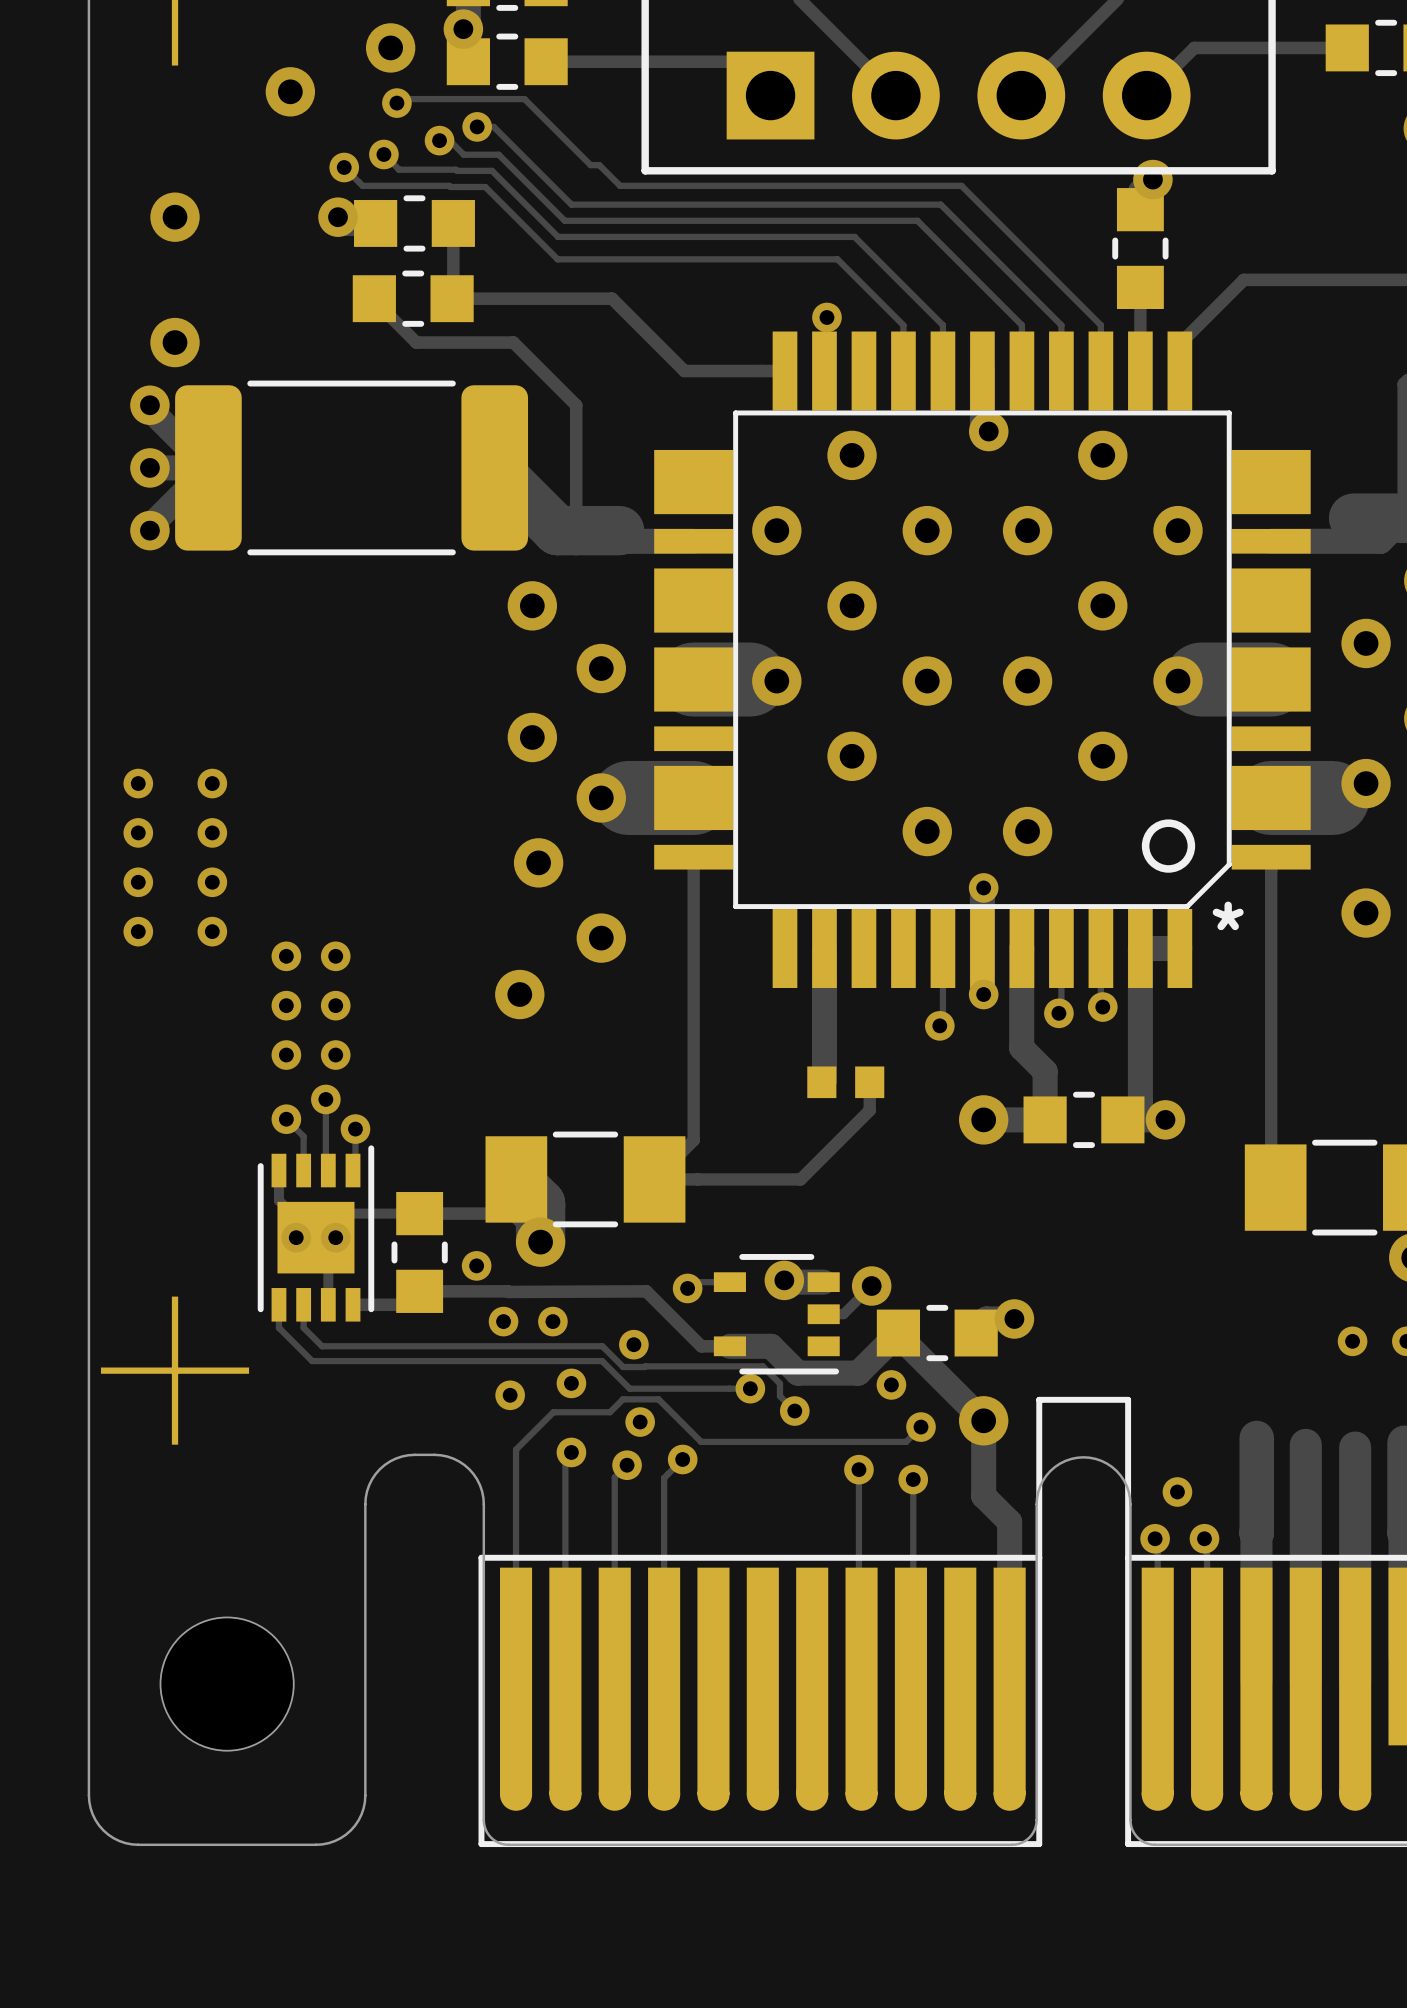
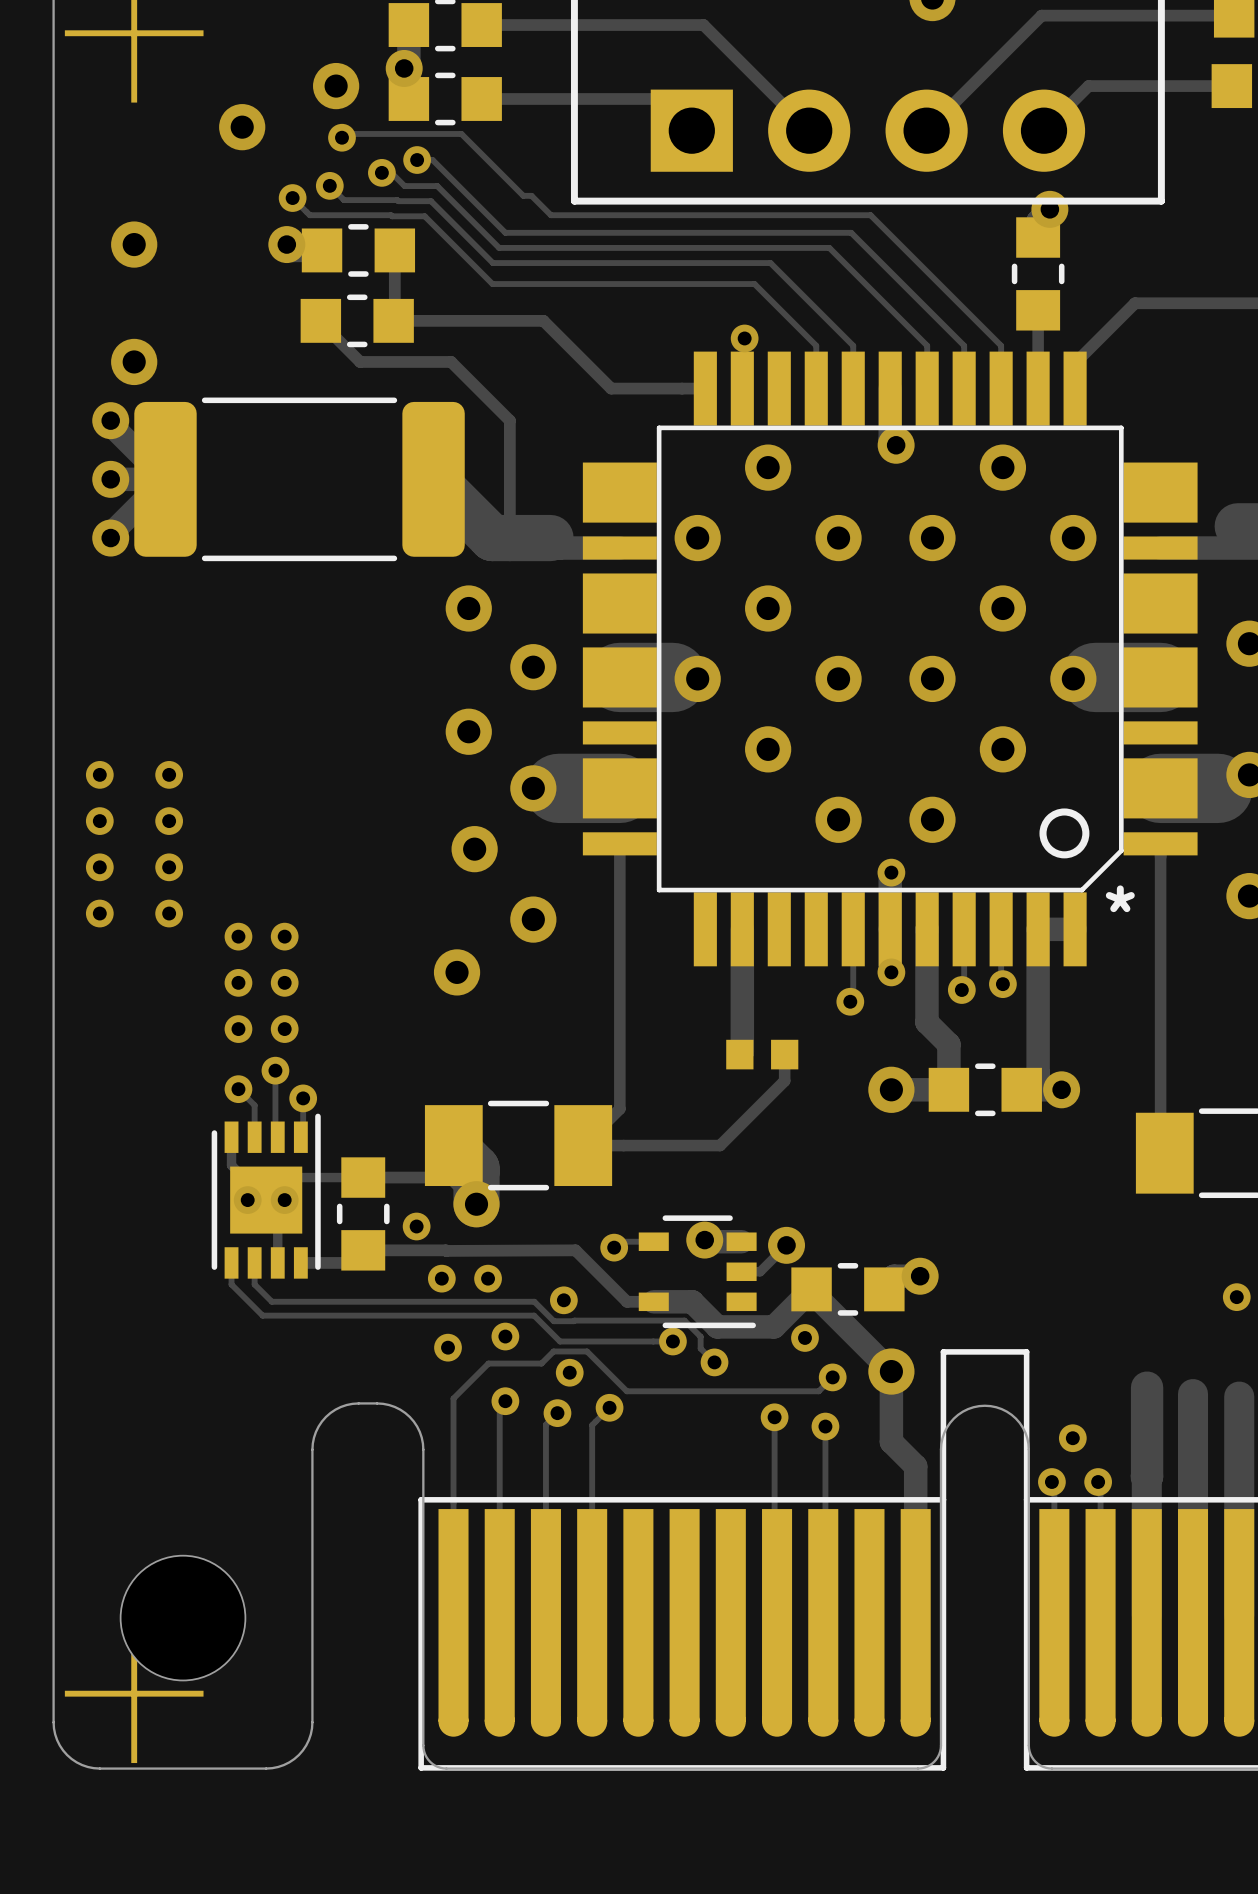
part position: (175, 1370) -> (134, 1693)

